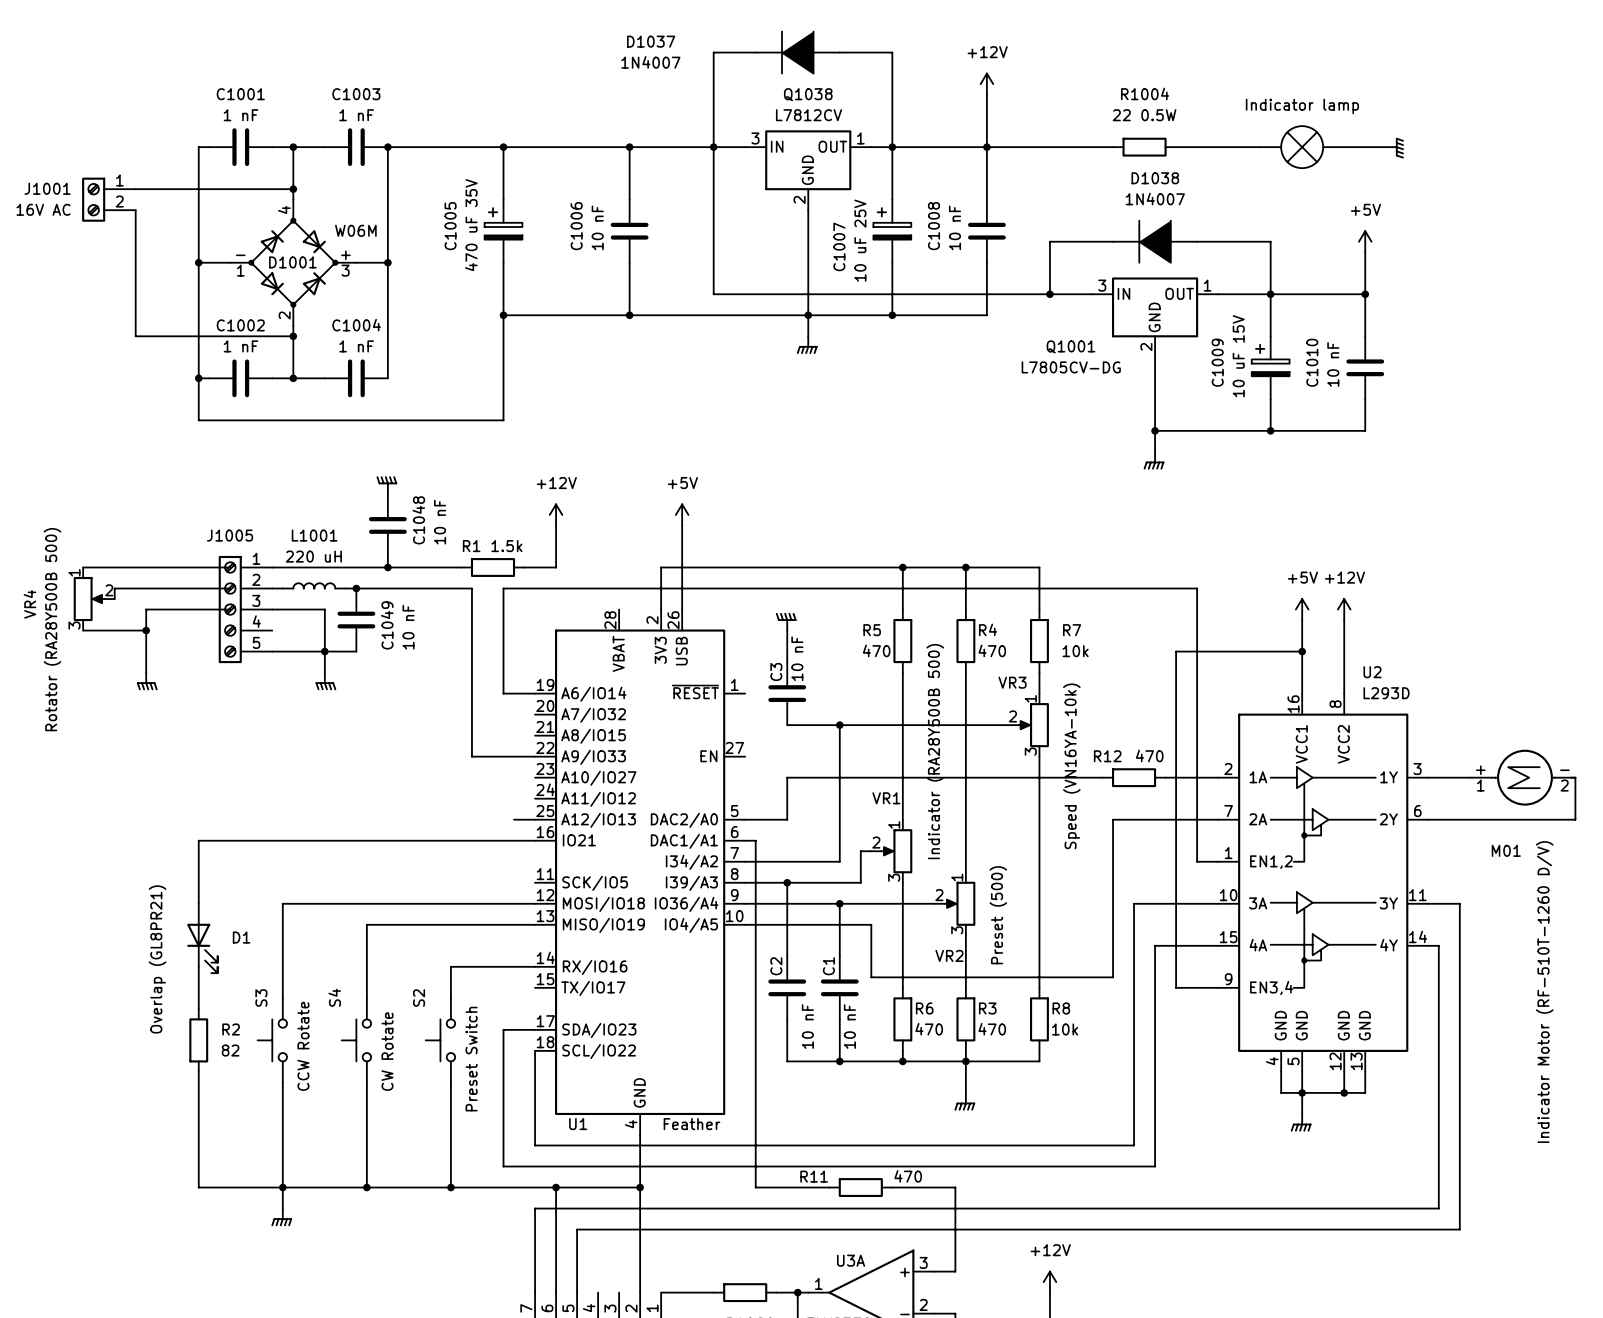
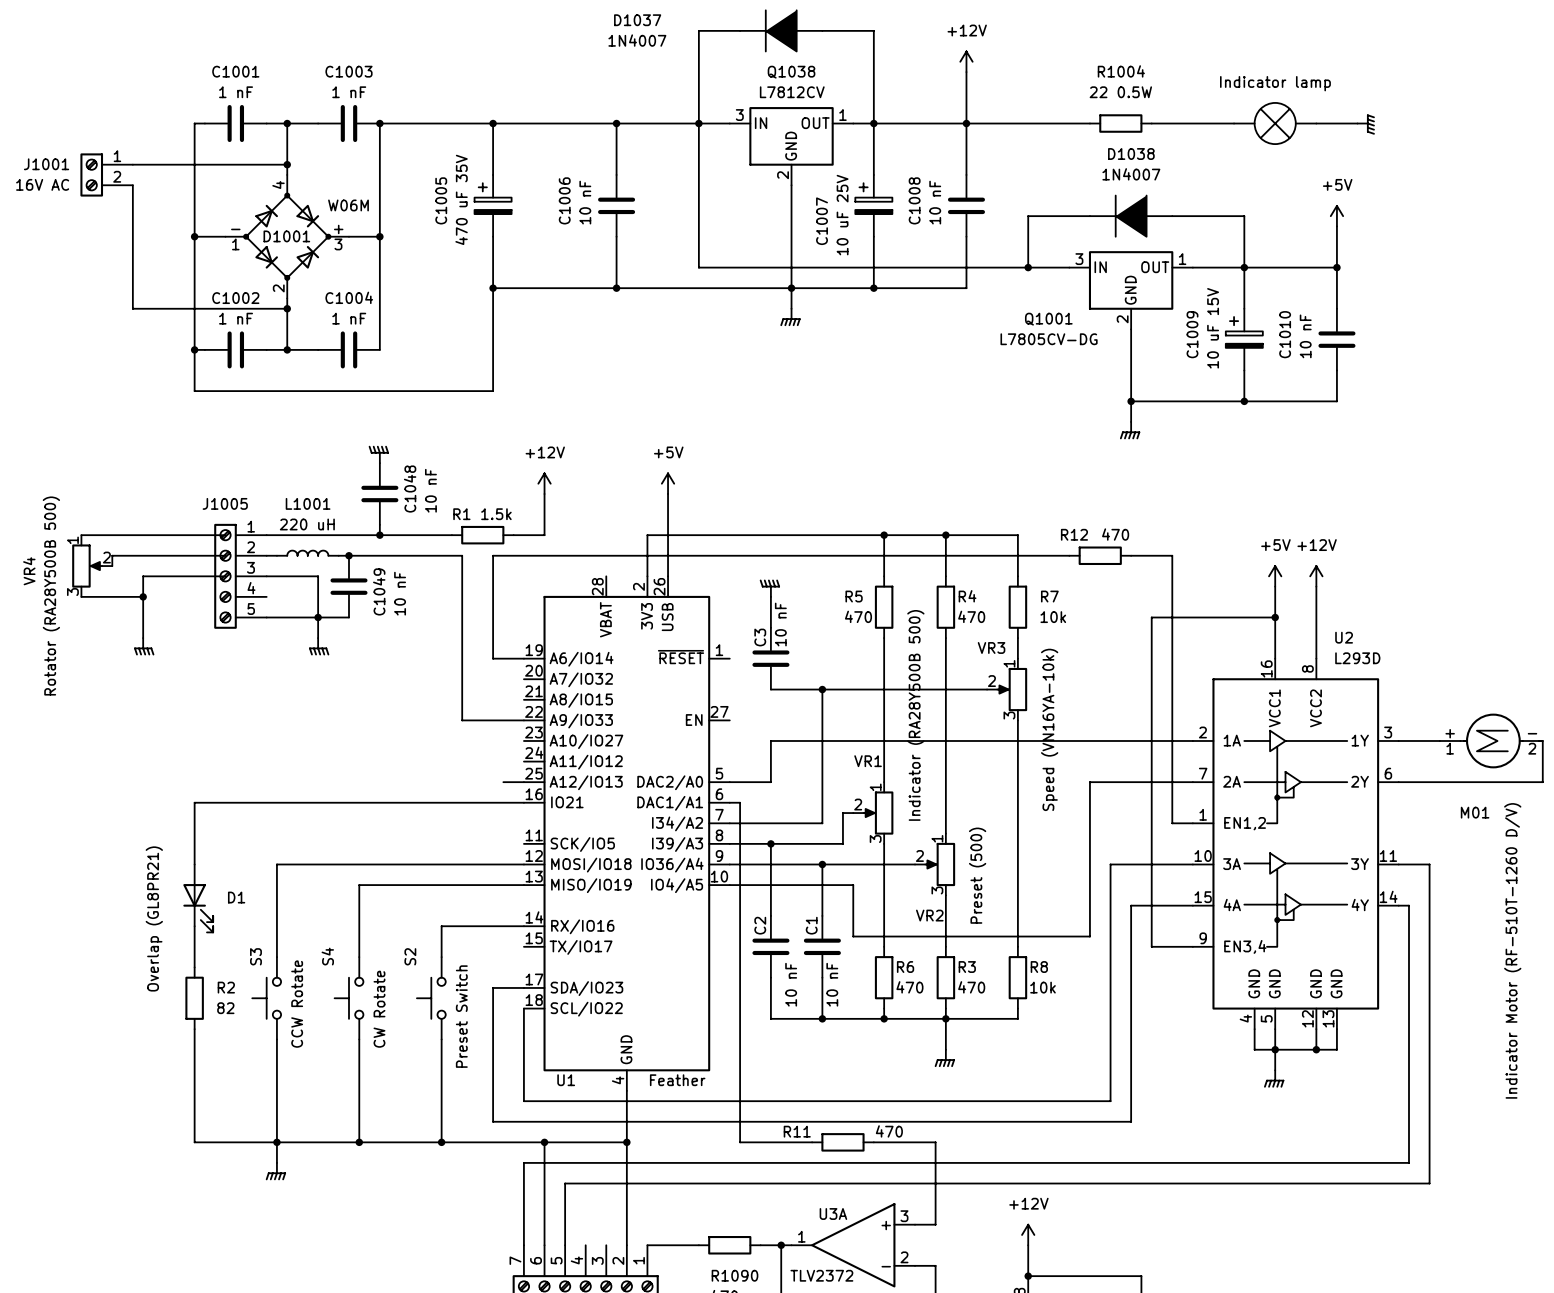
wire: (1092, 588) (1155, 588) -> (1079, 740) (1141, 740)
R12 position: (1134, 777) -> (1100, 555)

